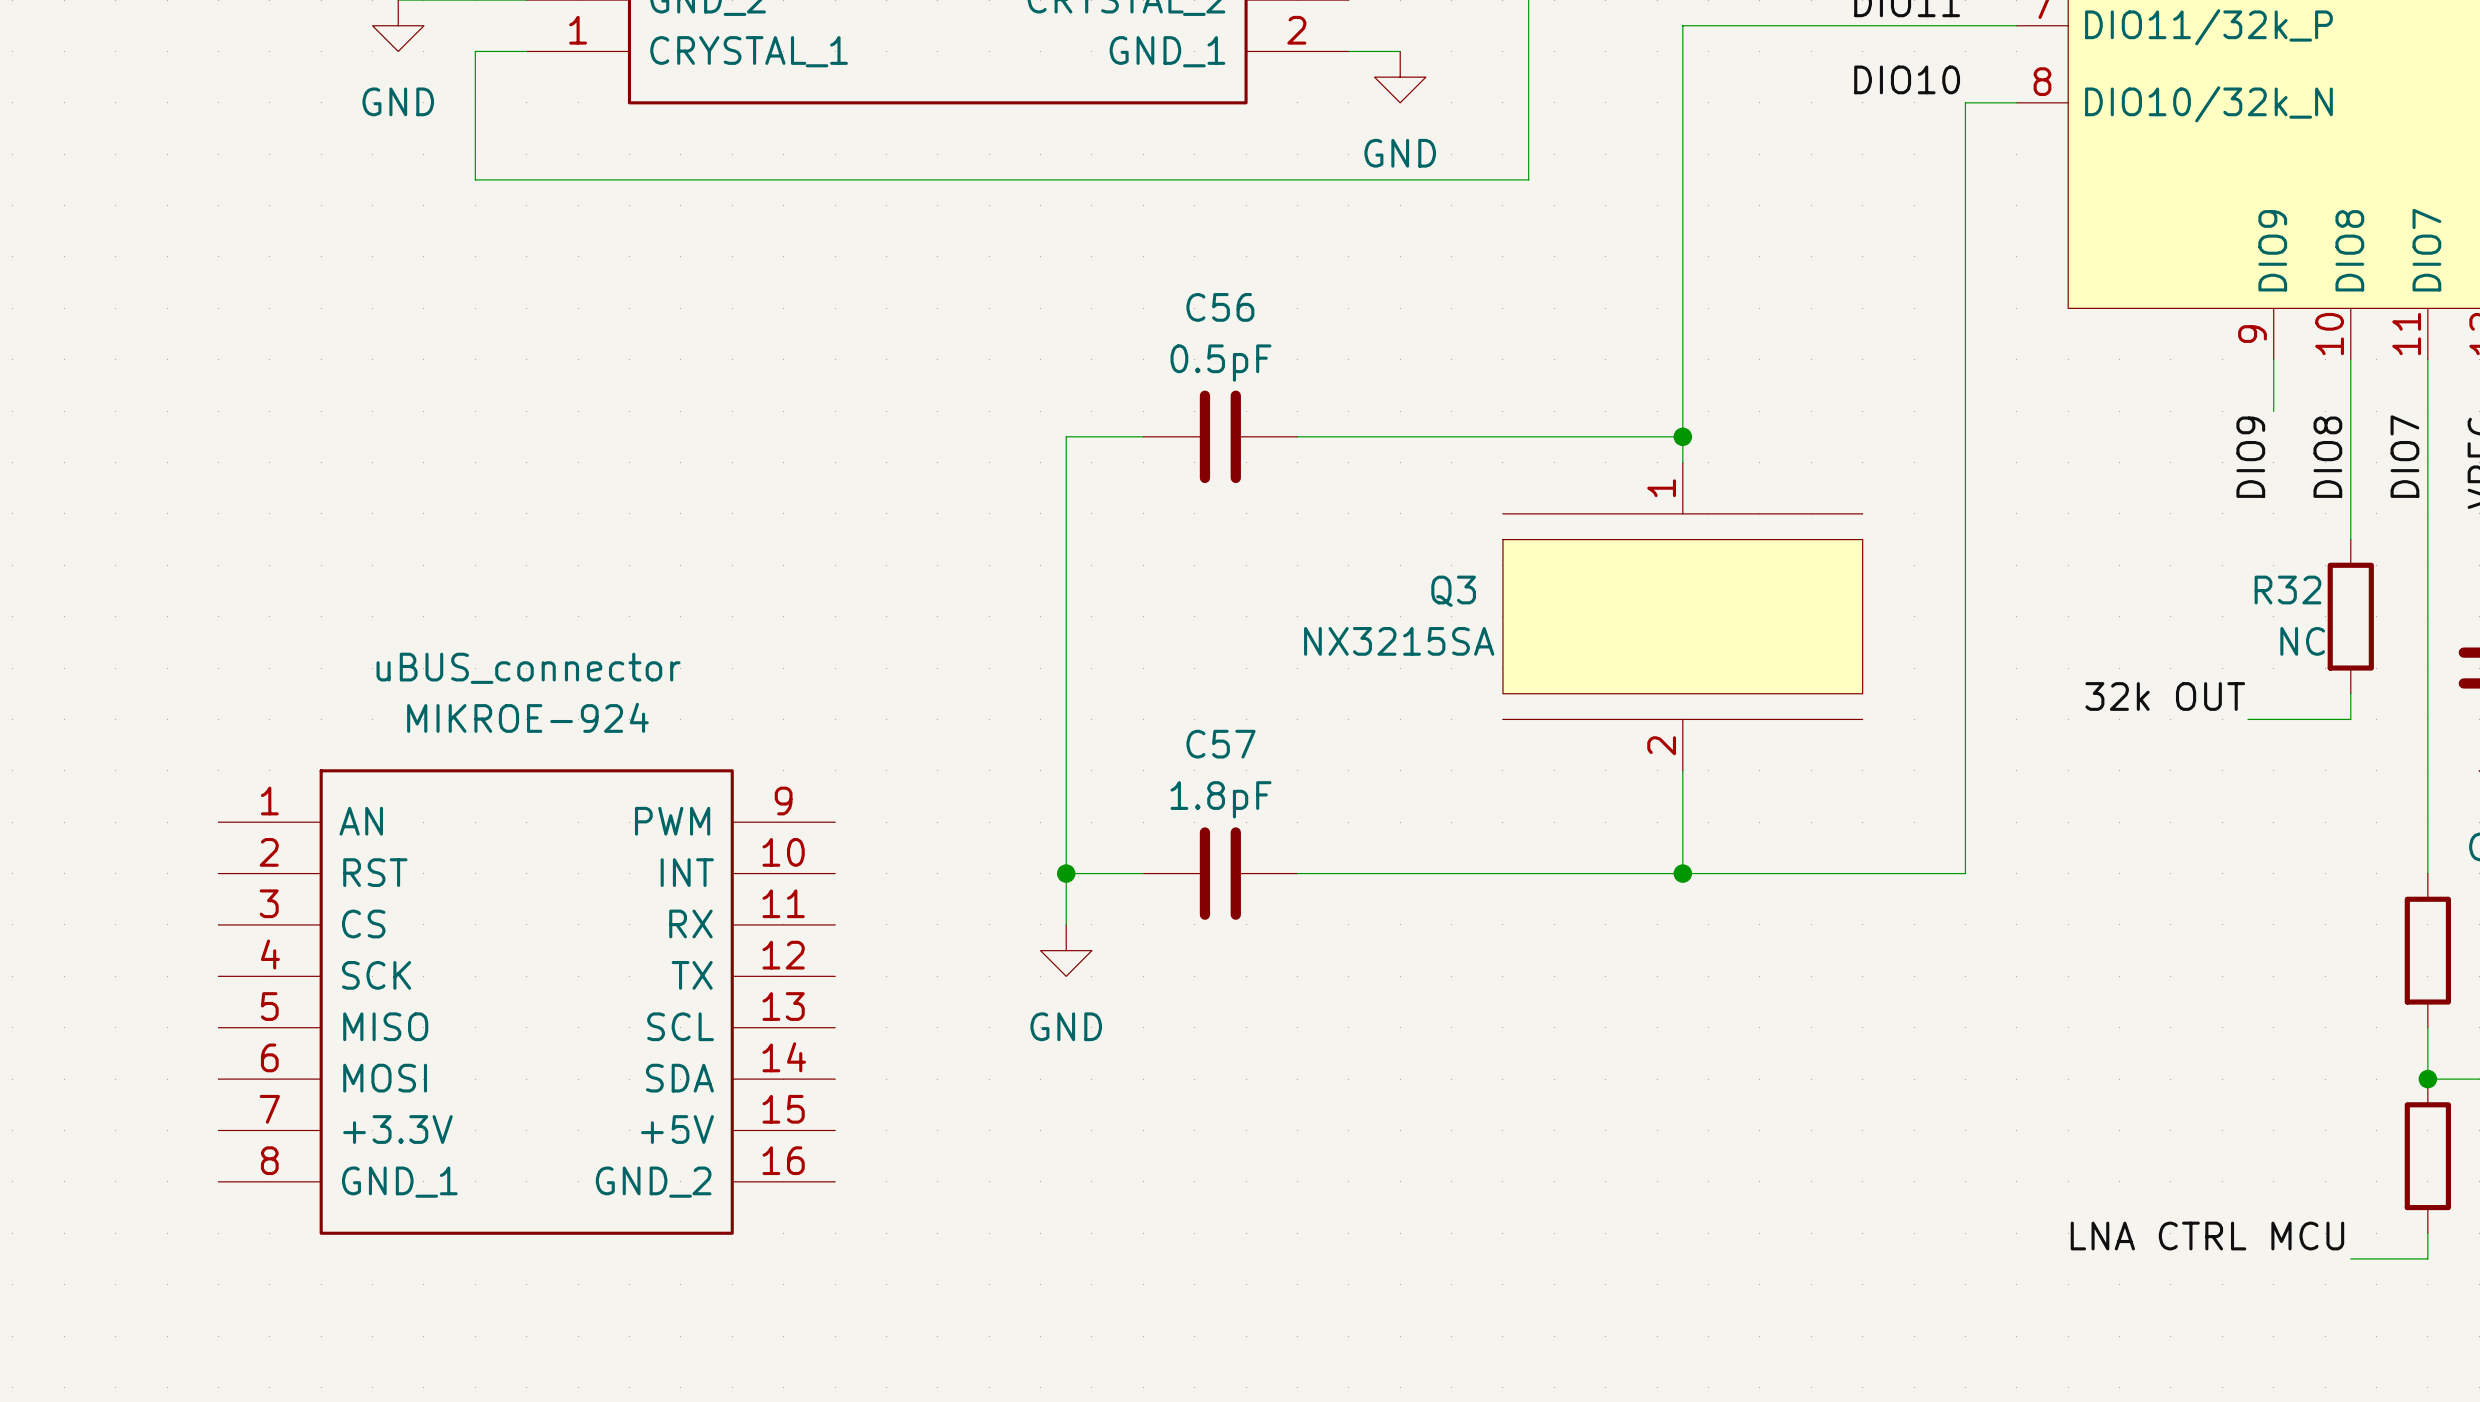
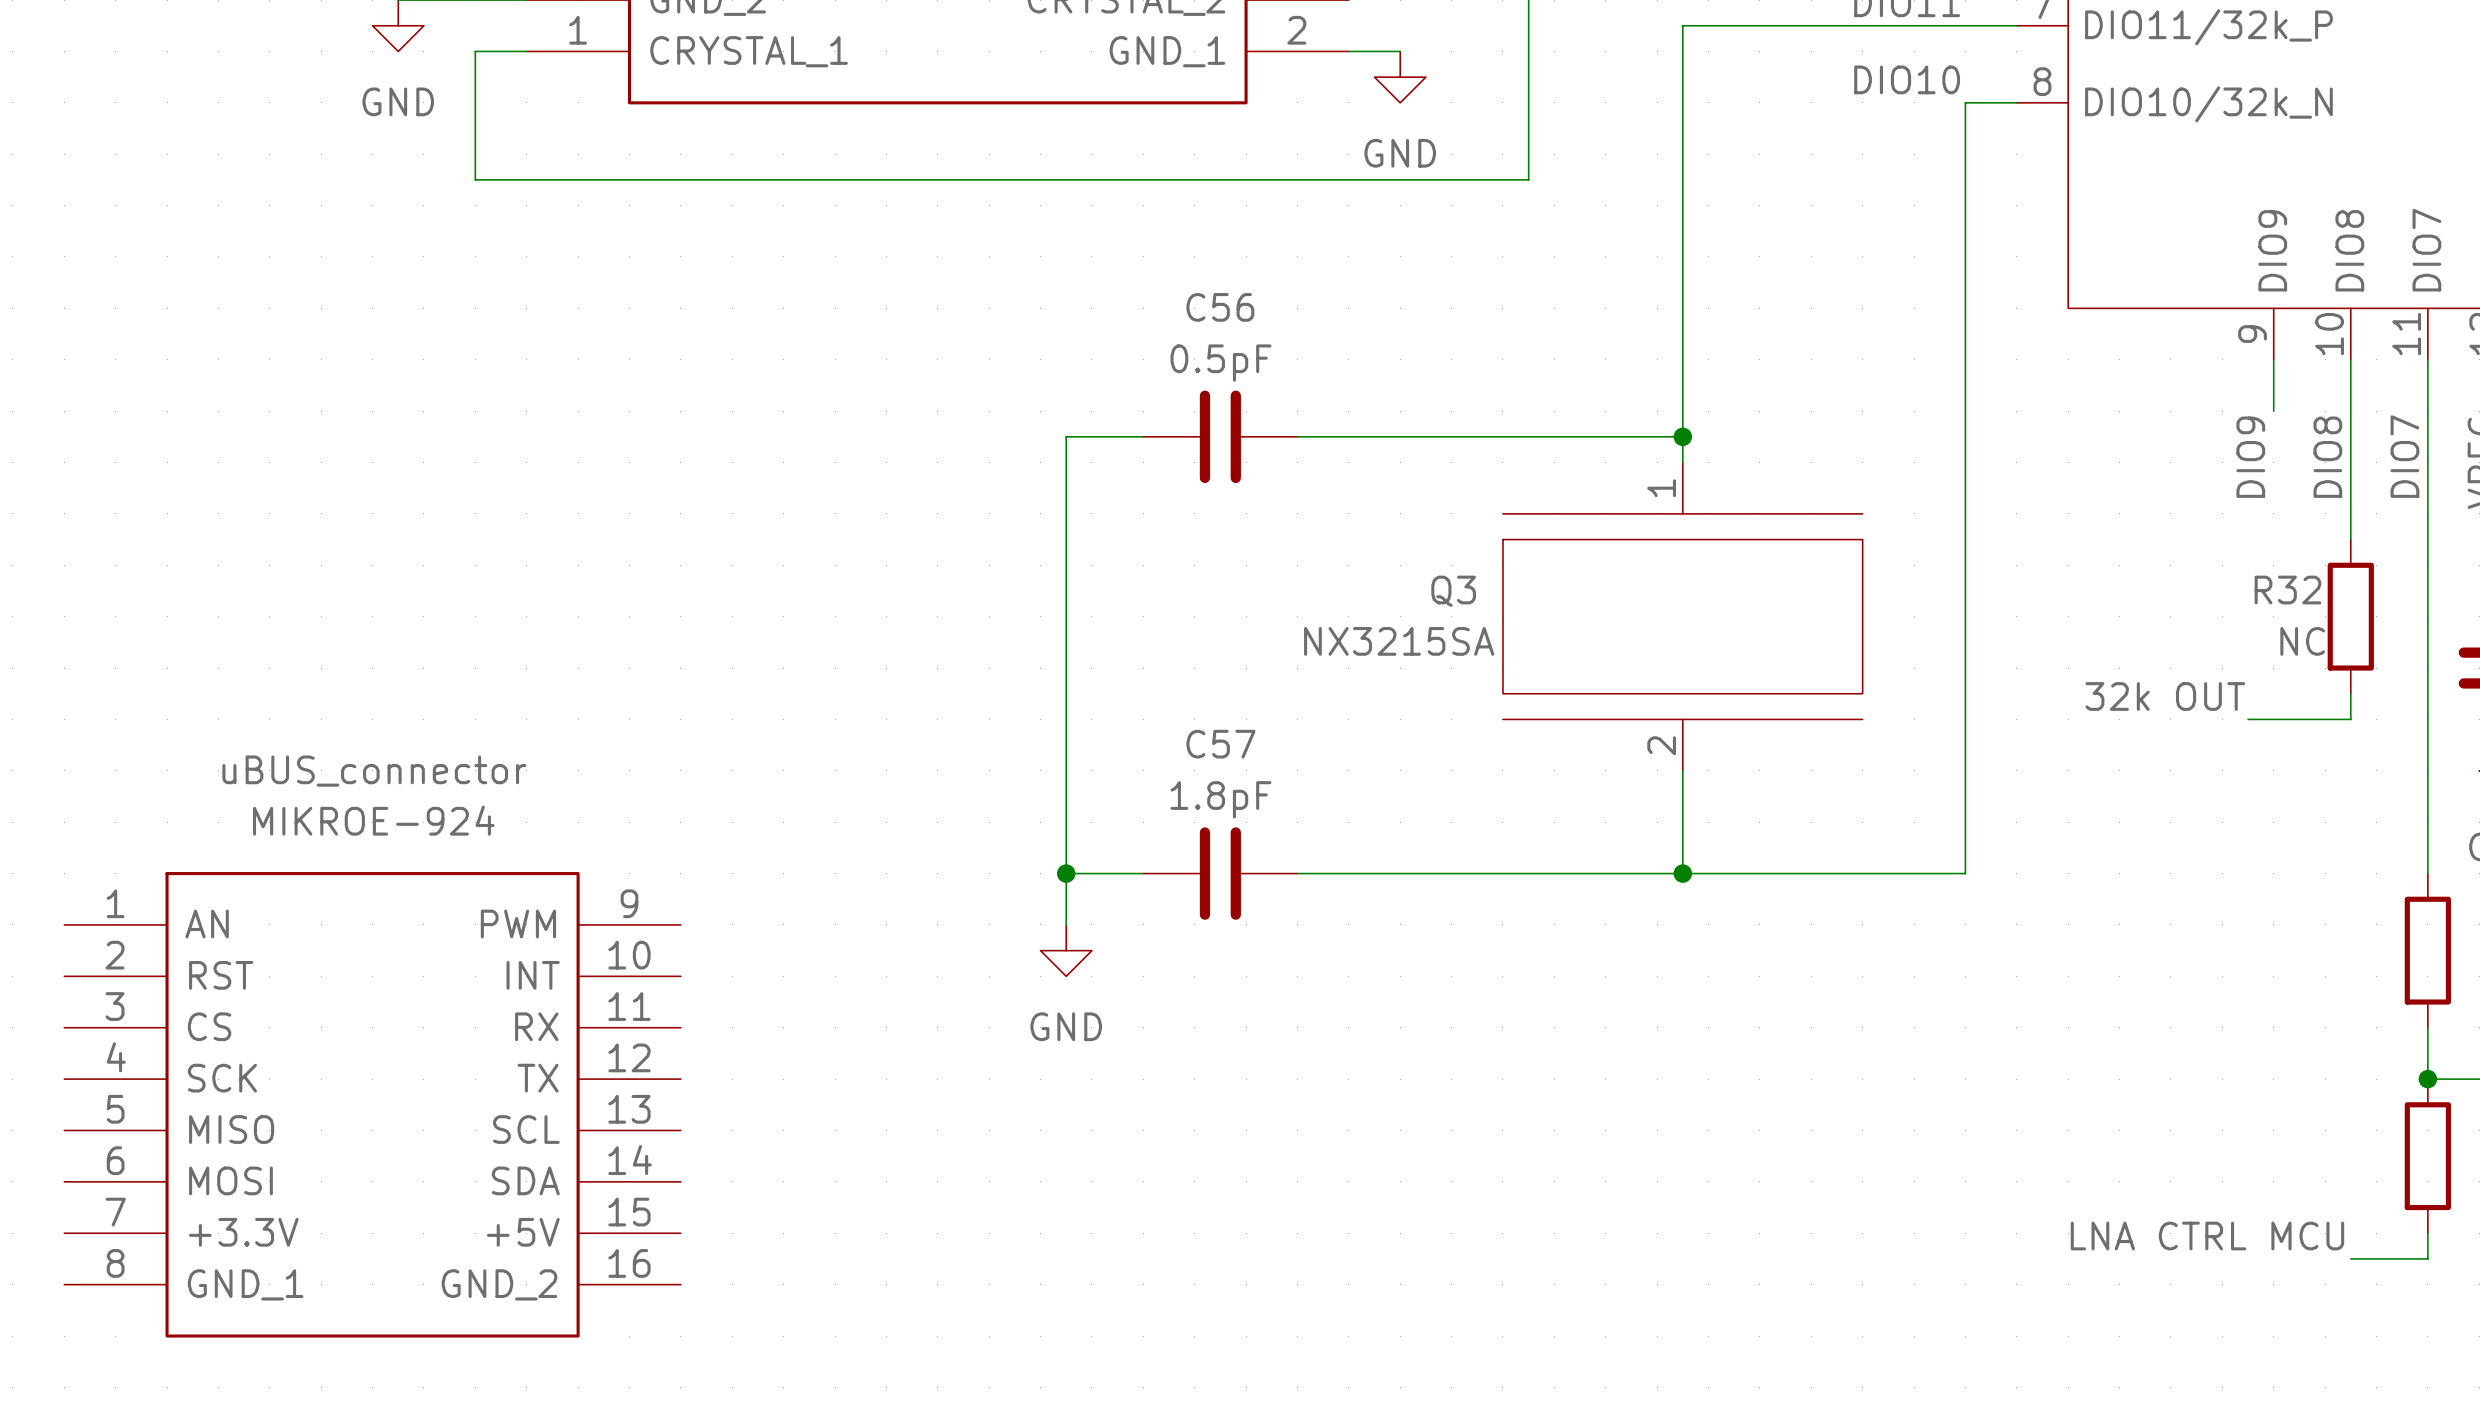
uBUS_connector position: (526, 1002) -> (372, 1104)

